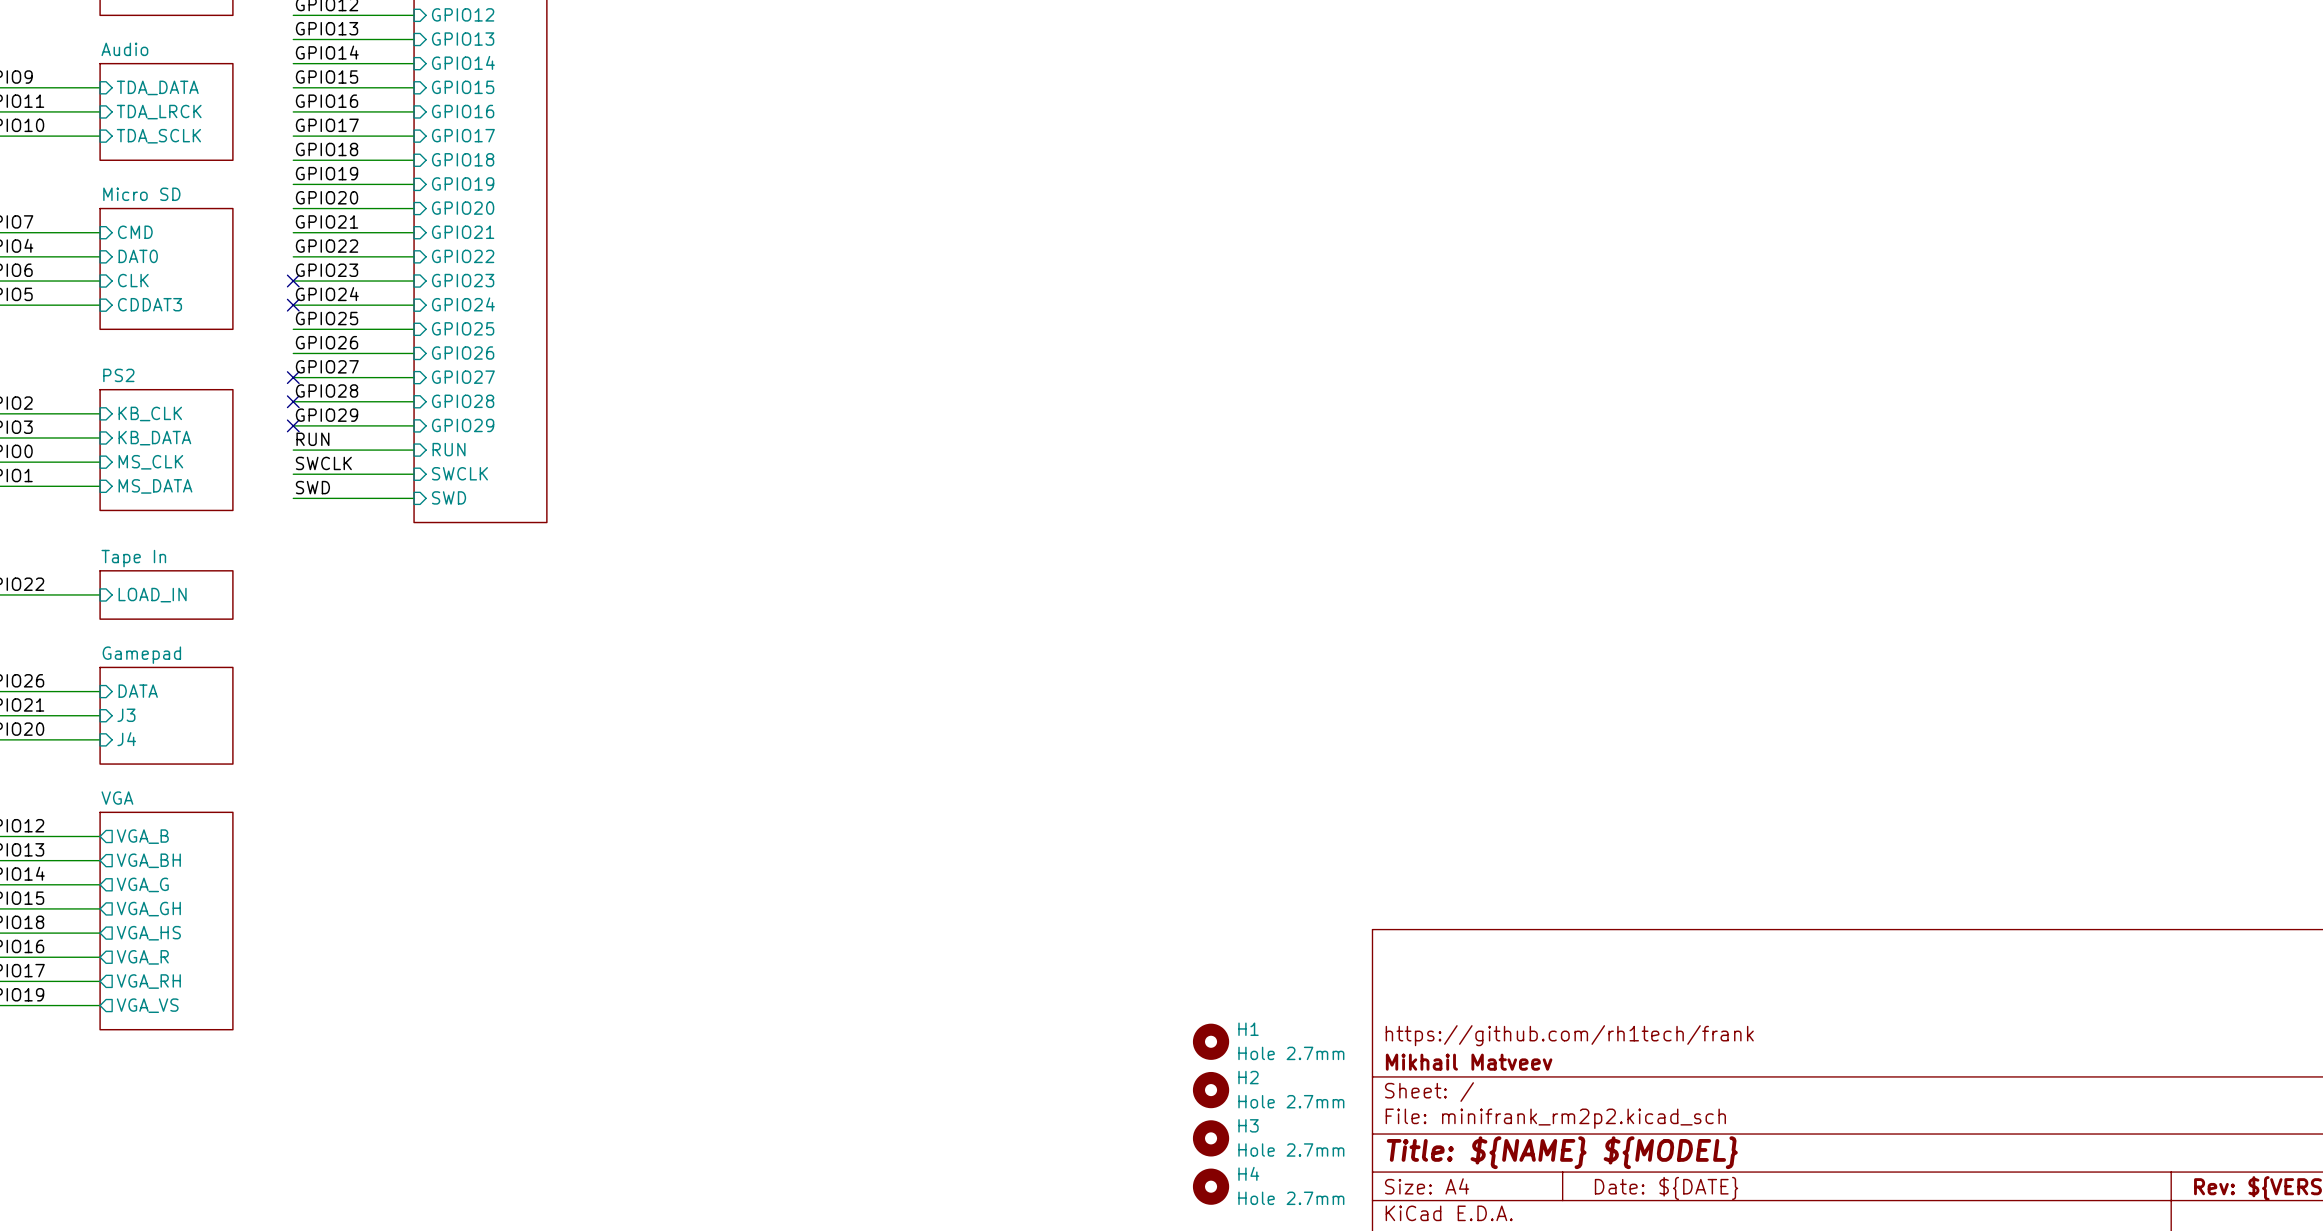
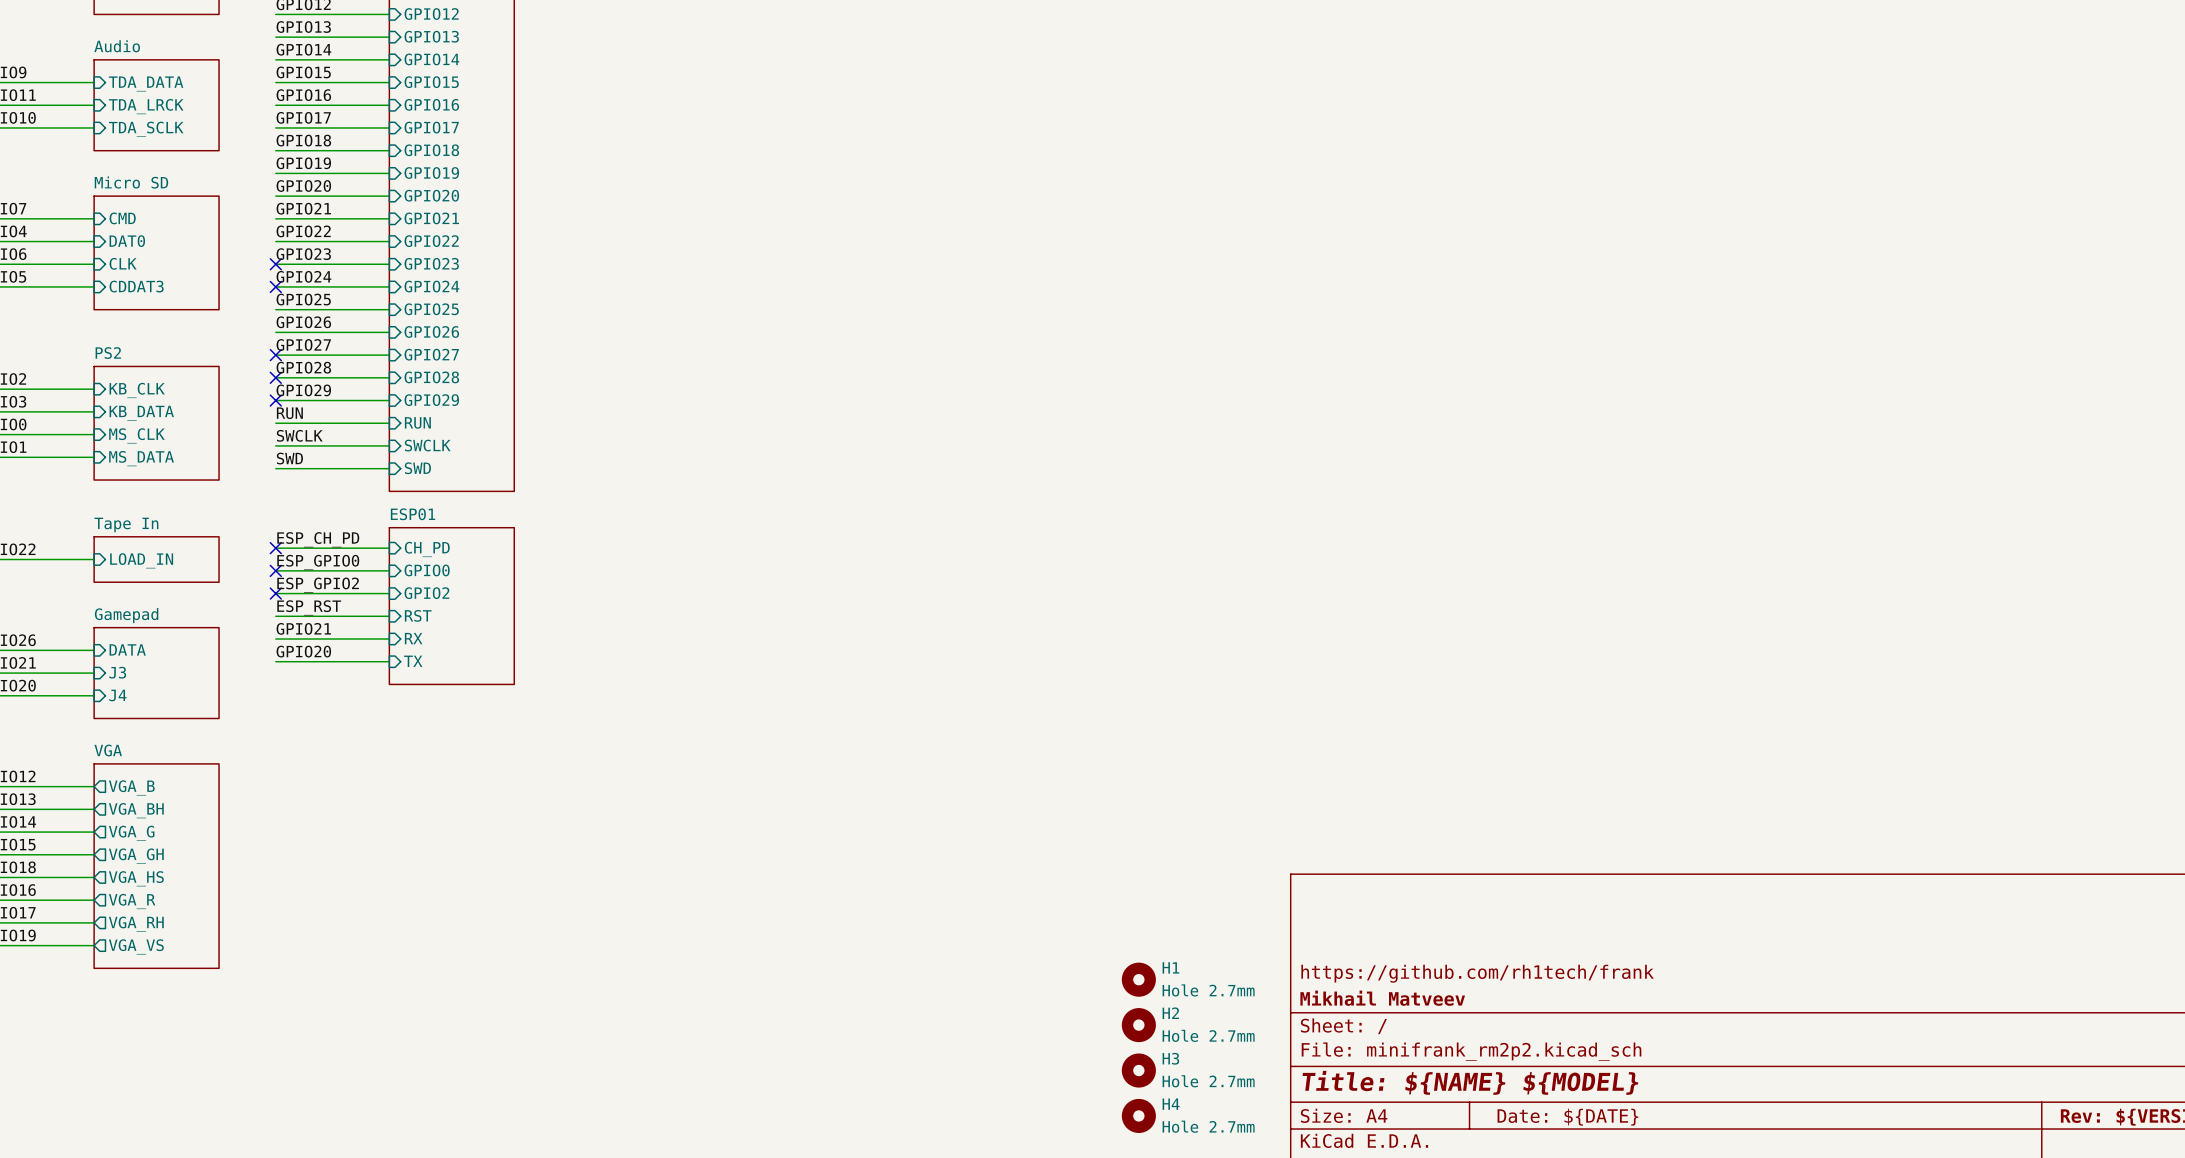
label: none -> ESP_CH_PD (318, 539)
wire: none -> (275, 548) (389, 548)
no-connect mark: none -> (275, 548)
sheet pin: none -> CH_PD (427, 549)
label: none -> ESP_GPIO0 (318, 562)
sheet pin: none -> GPIO0 (427, 570)
wire: none -> (275, 570) (389, 570)
no-connect mark: none -> (275, 570)
label: none -> ESP_GPIO2 (318, 585)
sheet pin: none -> GPIO2 (426, 593)
wire: none -> (275, 593) (389, 593)
no-connect mark: none -> (275, 593)
sheet ESP01: none -> (451, 606)
label: none -> ESP_RST (309, 607)
sheet pin: none -> RST (418, 615)
wire: none -> (275, 616) (389, 616)
label: none -> GPIO21 (303, 628)
wire: none -> (275, 639) (389, 639)
sheet pin: none -> RX (413, 638)
label: none -> GPIO20 (303, 651)
wire: none -> (275, 661) (389, 661)
sheet pin: none -> TX (413, 661)

